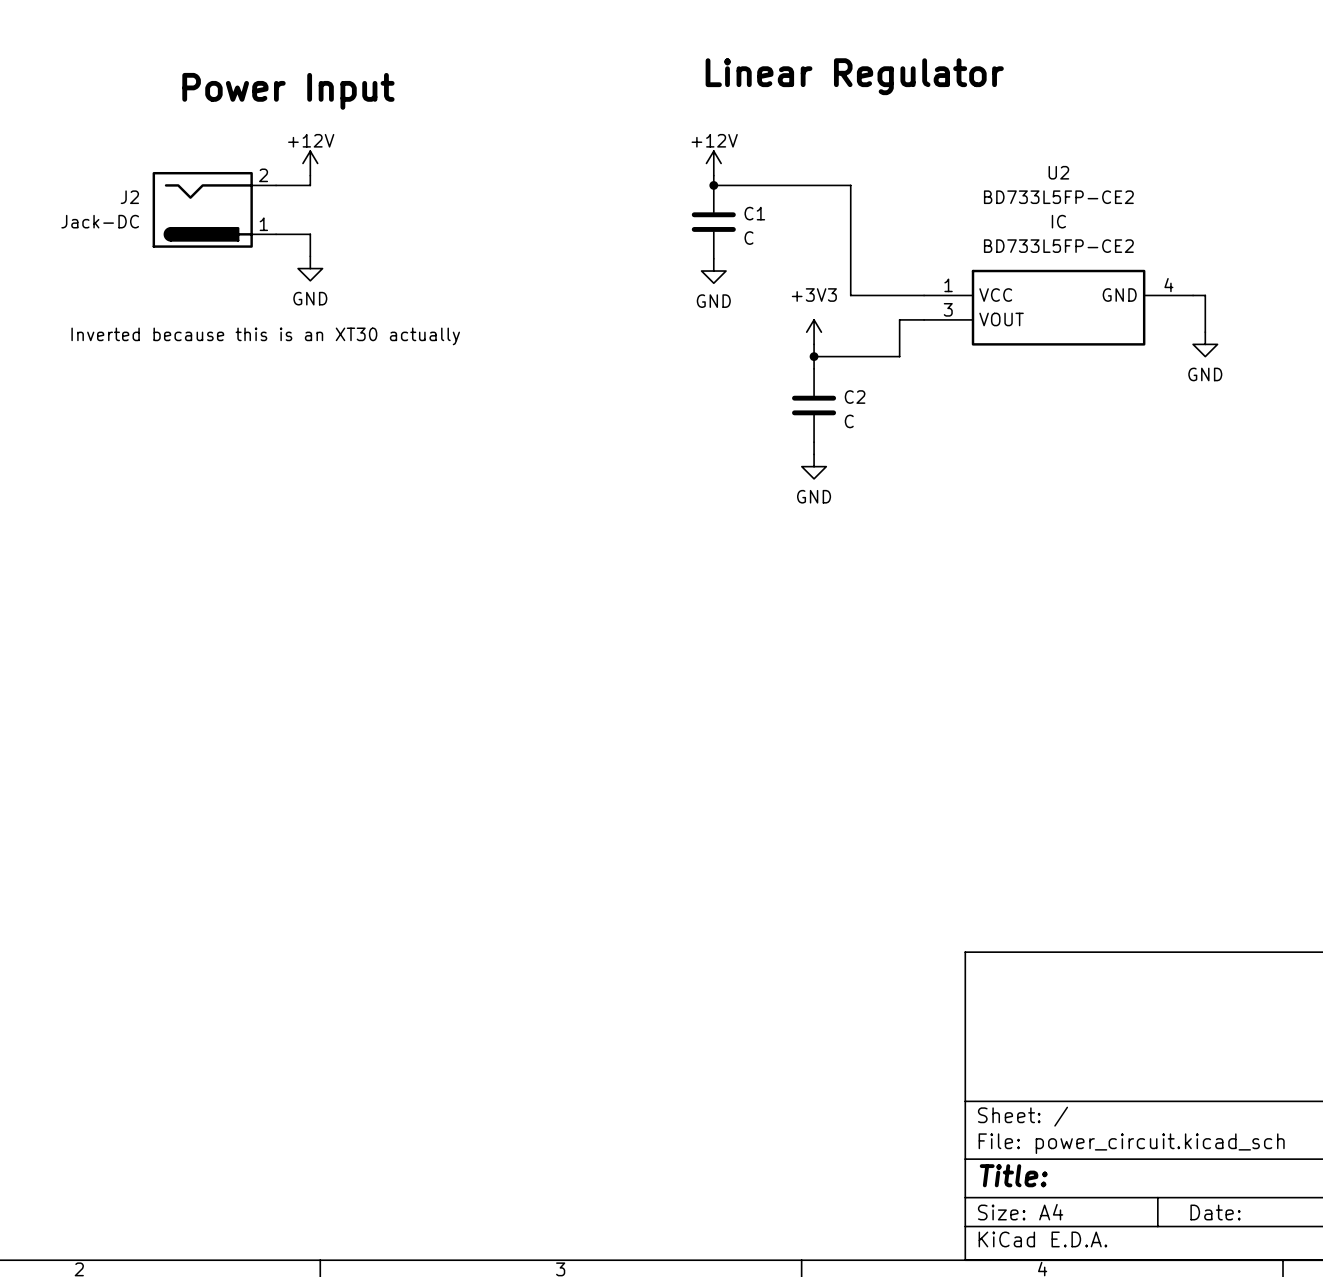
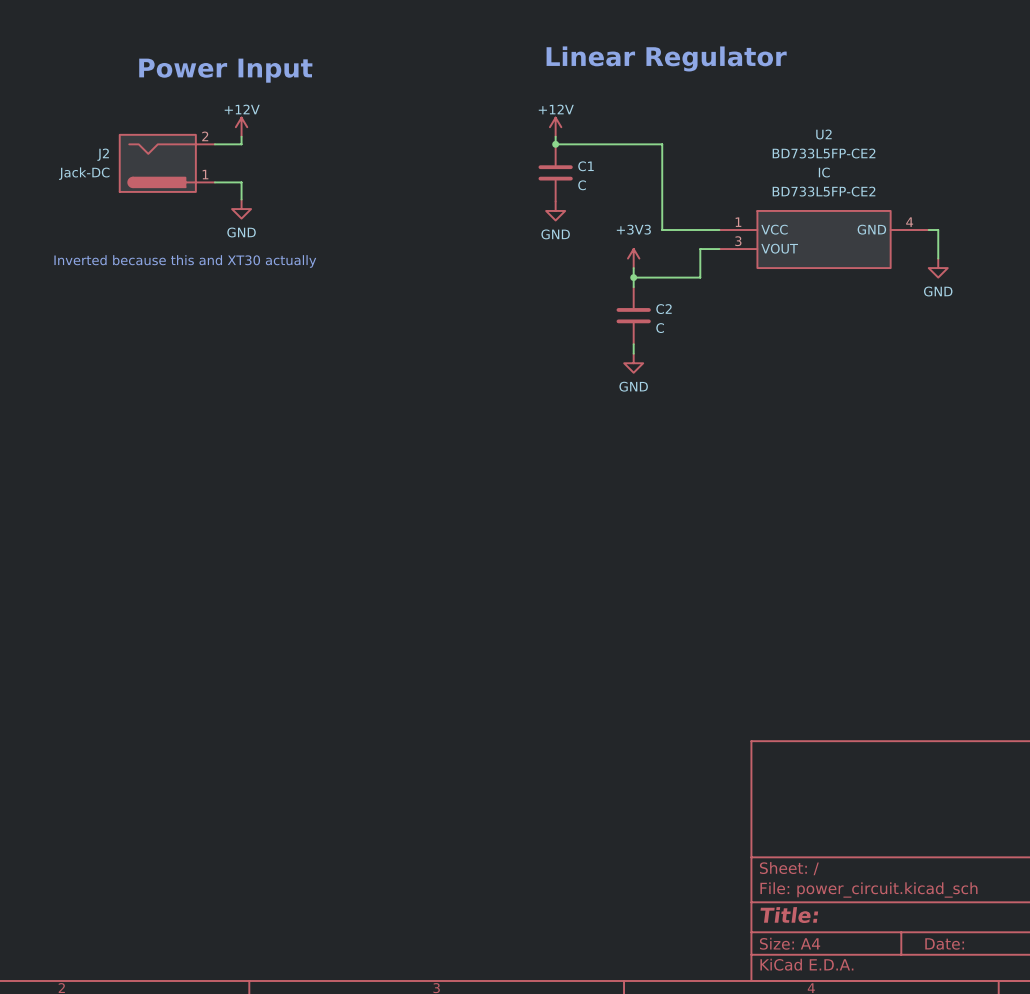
text: Inverted because this is an XT30 actually (265, 336) -> Inverted because this and XT30 actually (185, 261)

